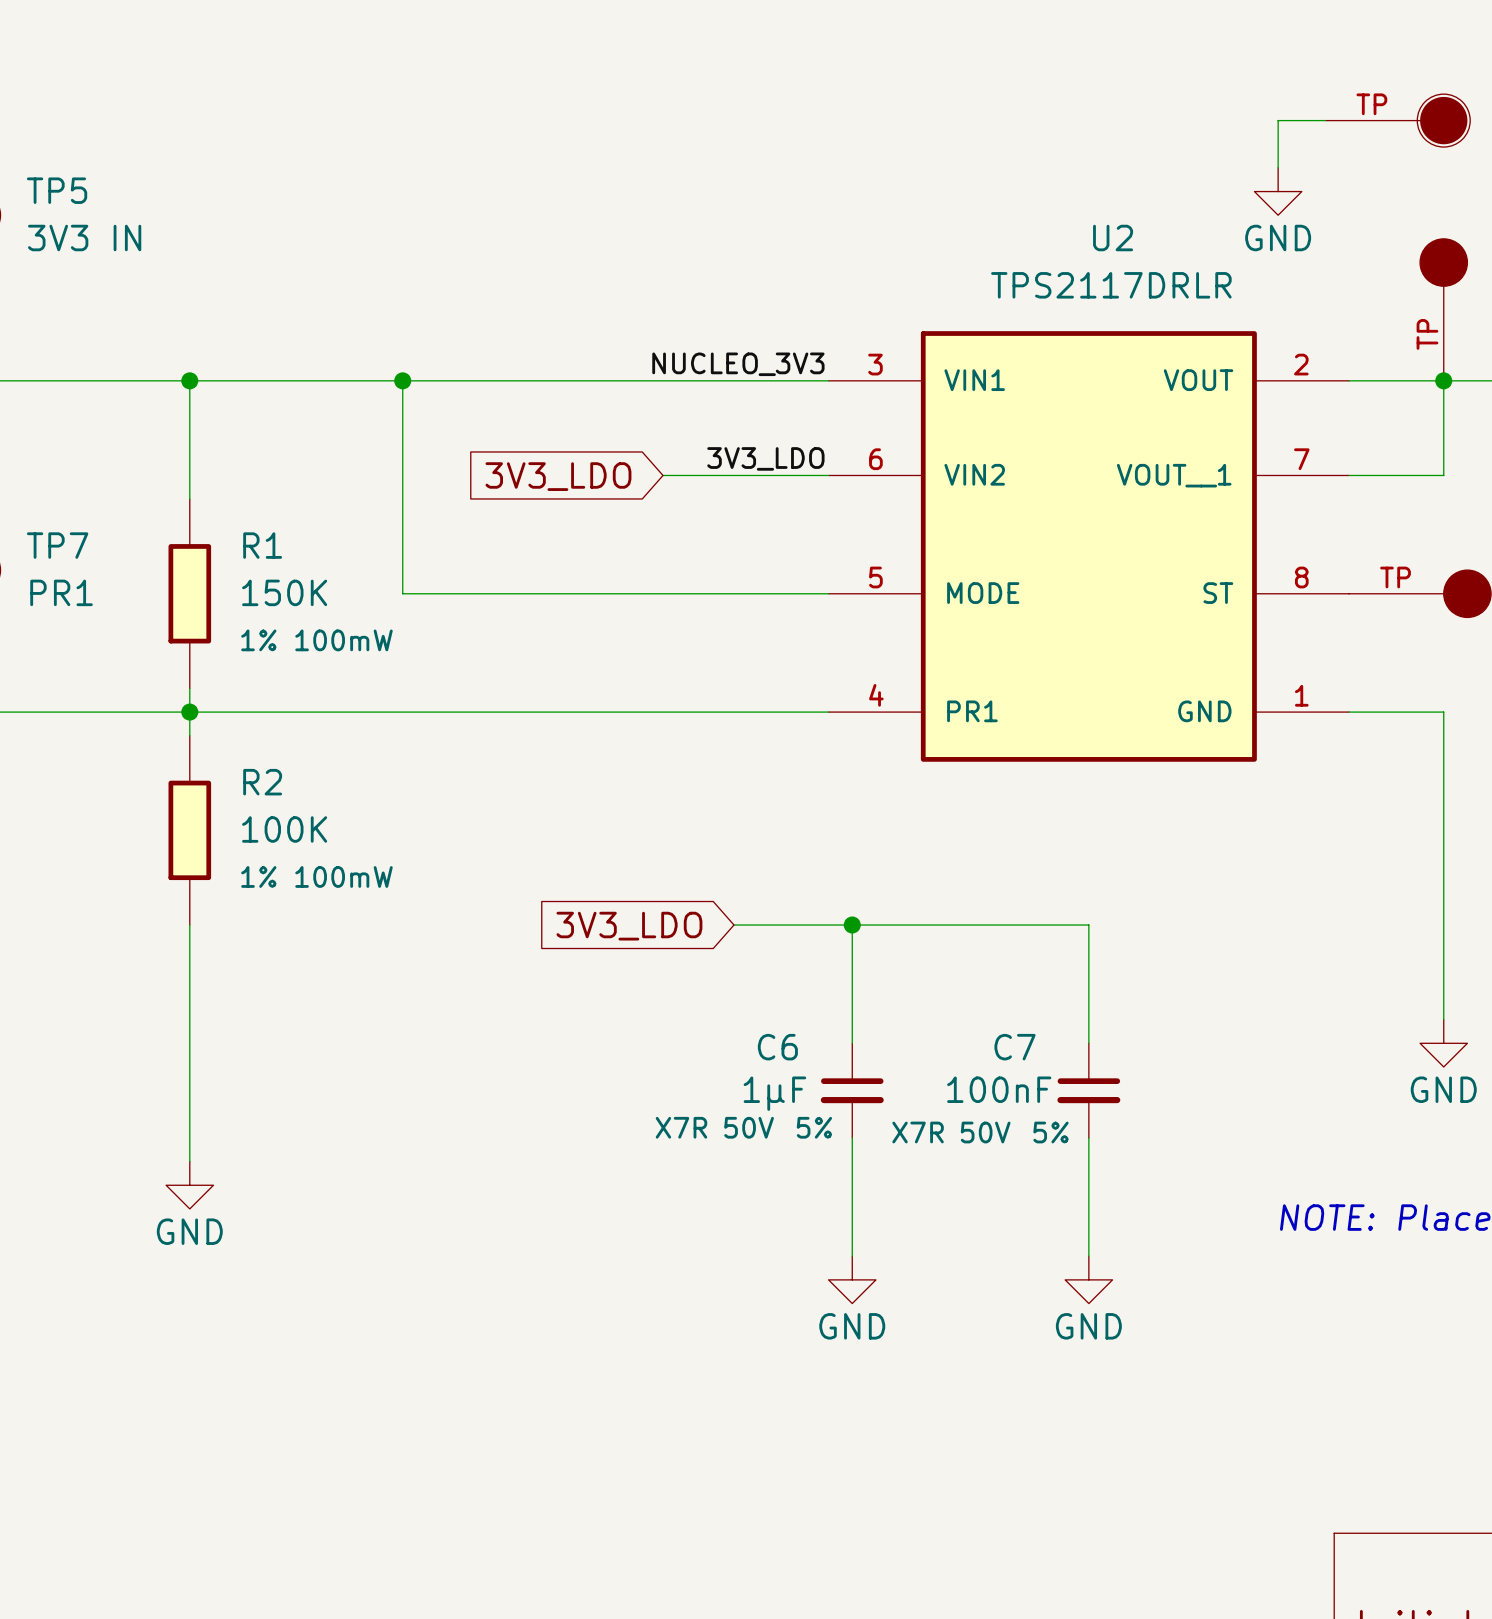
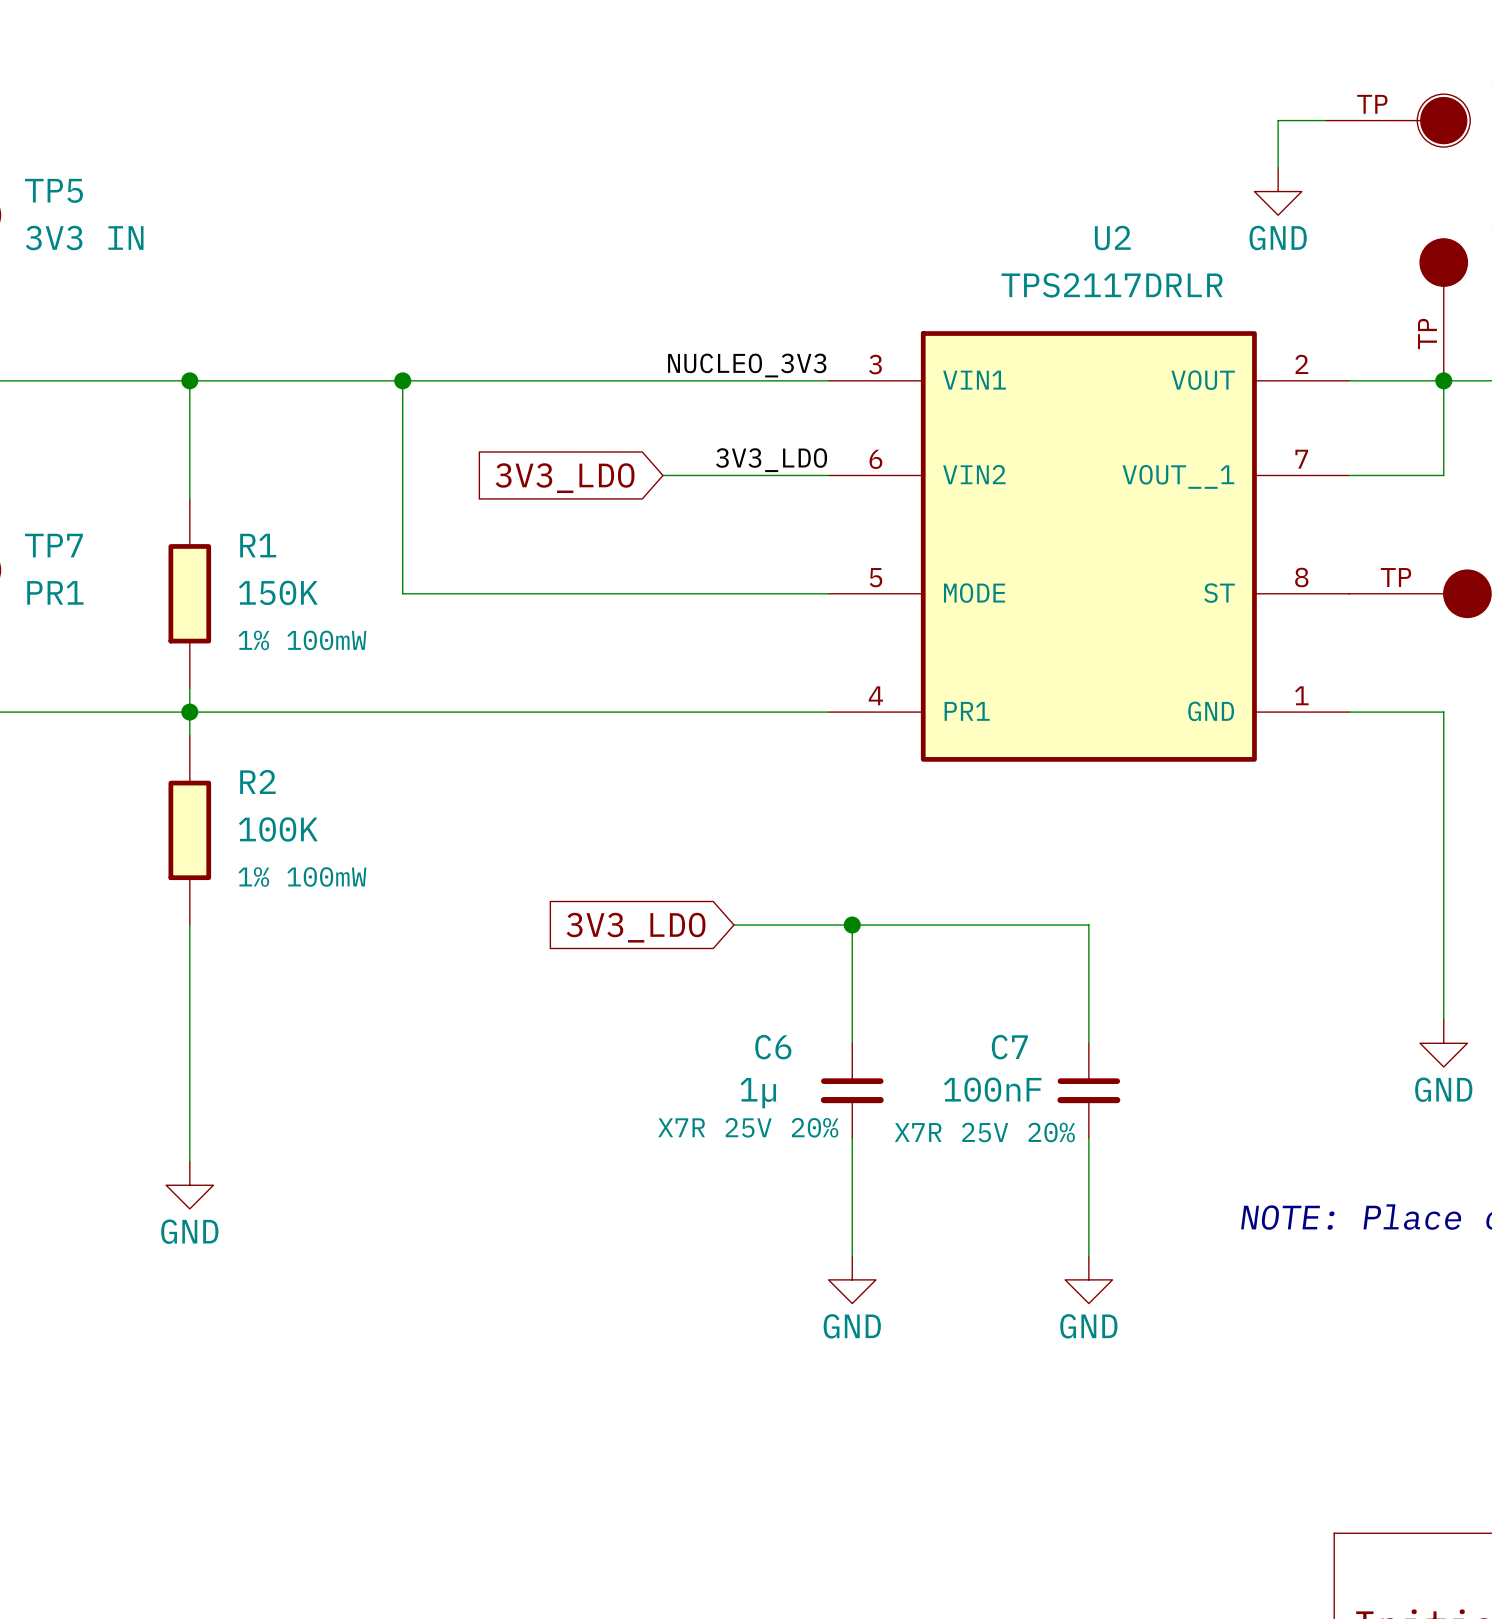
C6 value: 1µF (774, 1093) -> 1µ (758, 1093)
C6 text: 50V (749, 1127) -> 25V (748, 1127)
C6 text: 5% (814, 1127) -> 20% (815, 1127)
C7 text: 50V (985, 1132) -> 25V (985, 1132)
C7 text: 5% (1051, 1132) -> 20% (1051, 1132)

